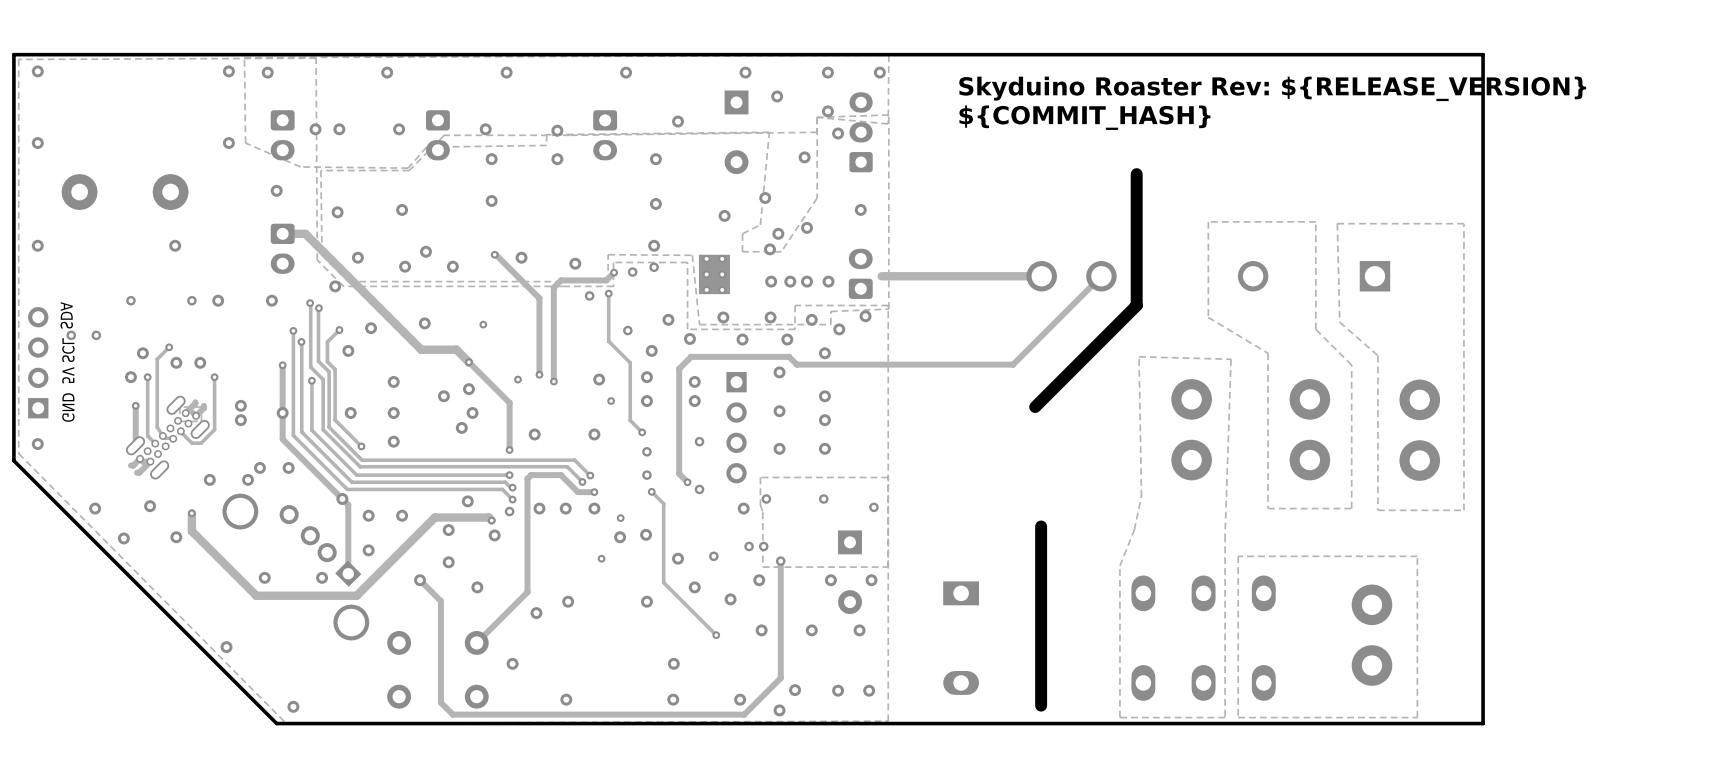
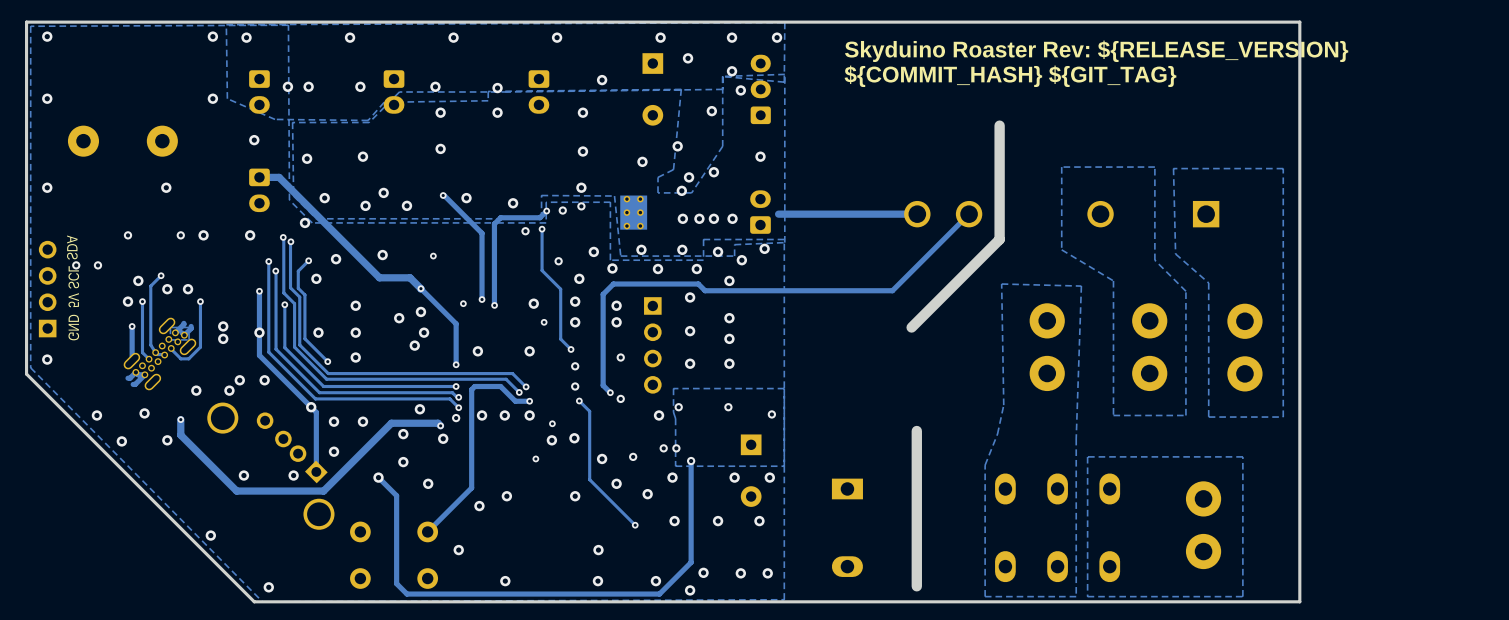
text: ${COMMIT_HASH} (1084, 117) -> ${COMMIT_HASH} ${GIT_TAG} (1010, 76)

